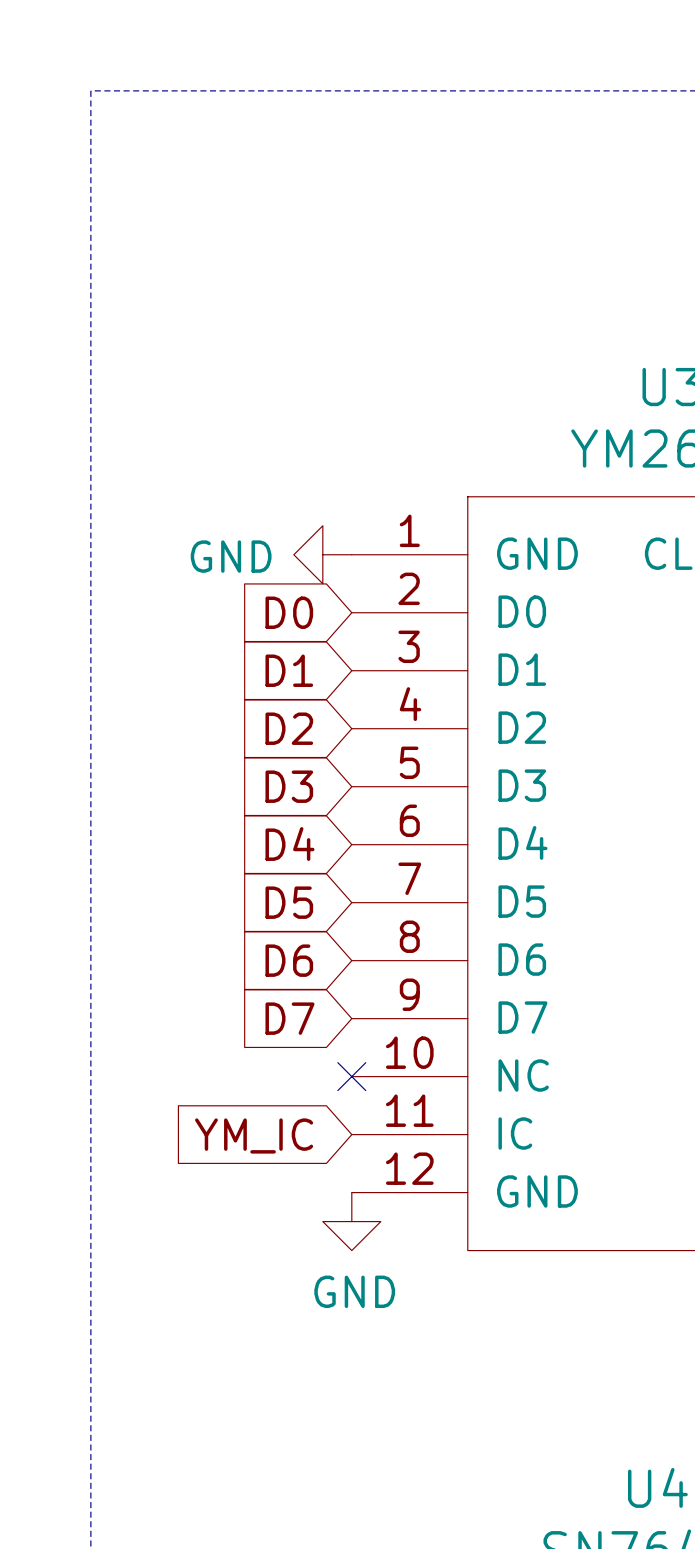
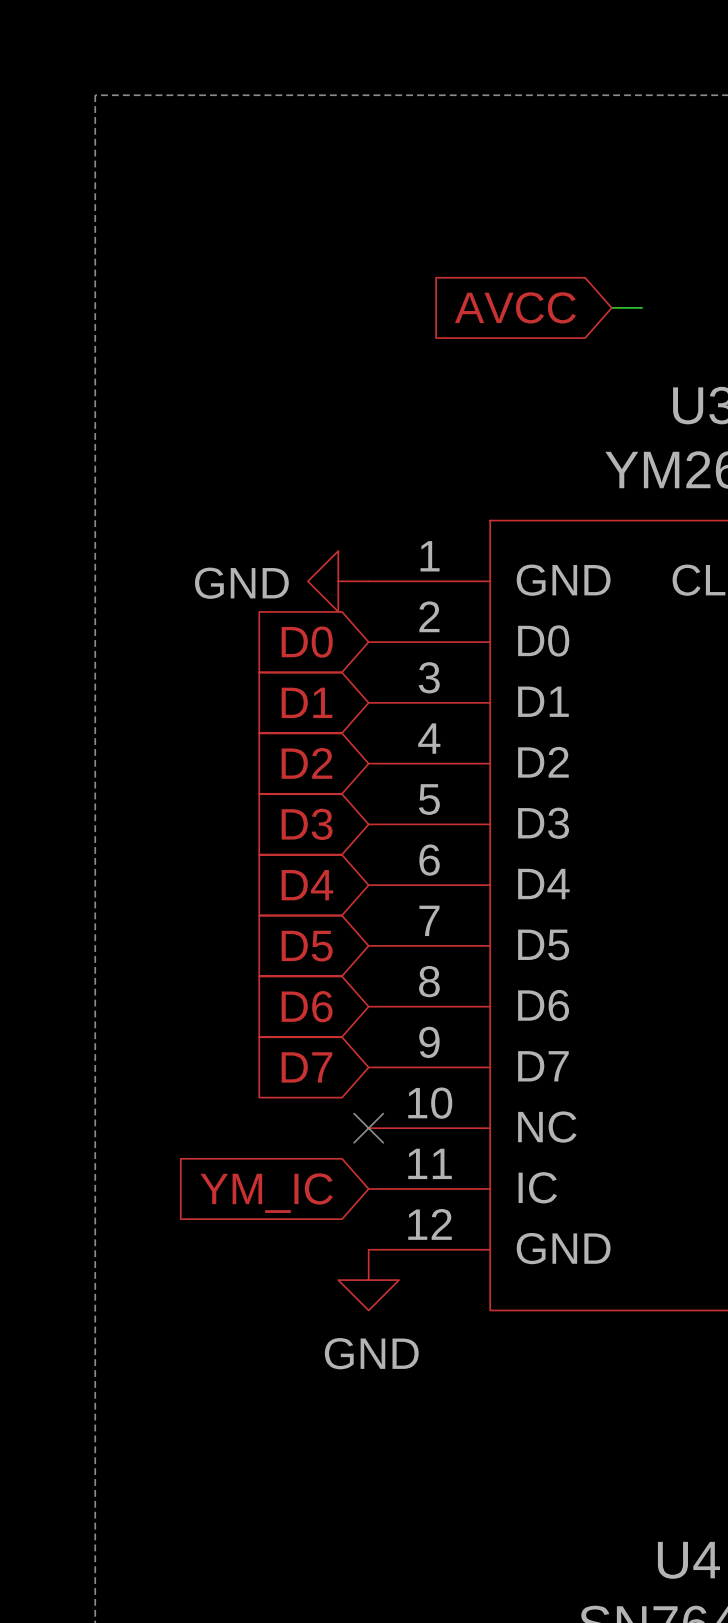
global label: none -> AVCC (515, 307)
wire: none -> (611, 307) (642, 307)

